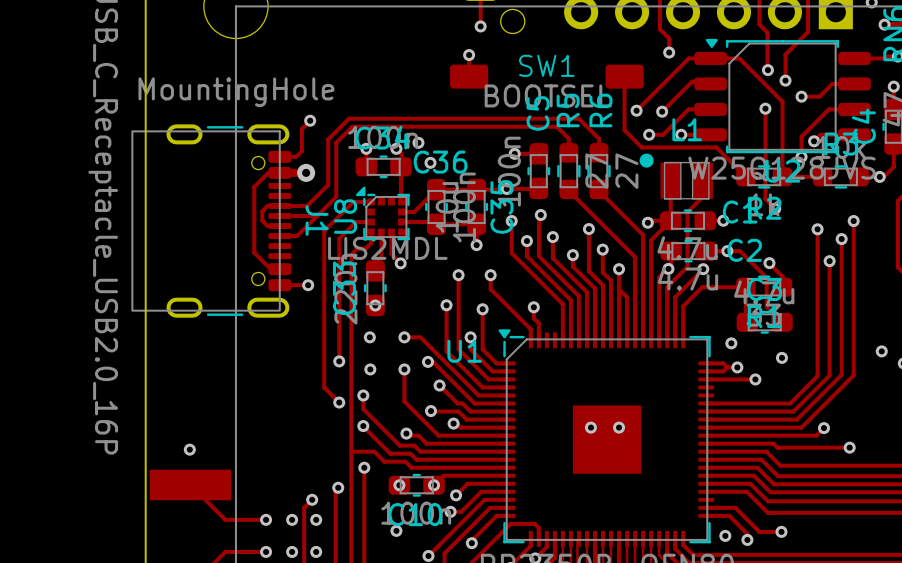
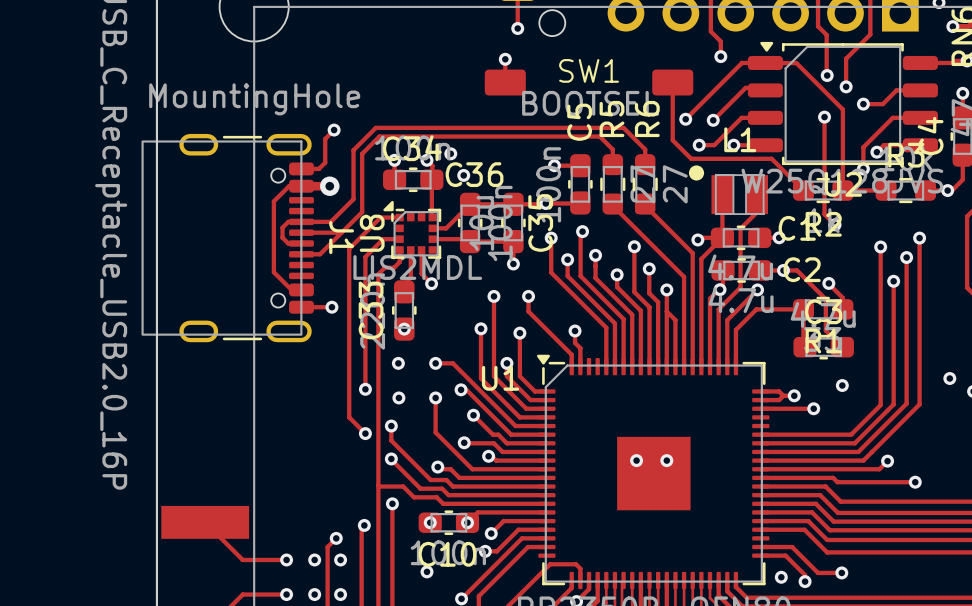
via: (731, 343) -> none
via: (189, 449) -> none
track: (507, 515) (496, 515) (470, 541) (471, 543) -> none
via: (471, 543) -> none

